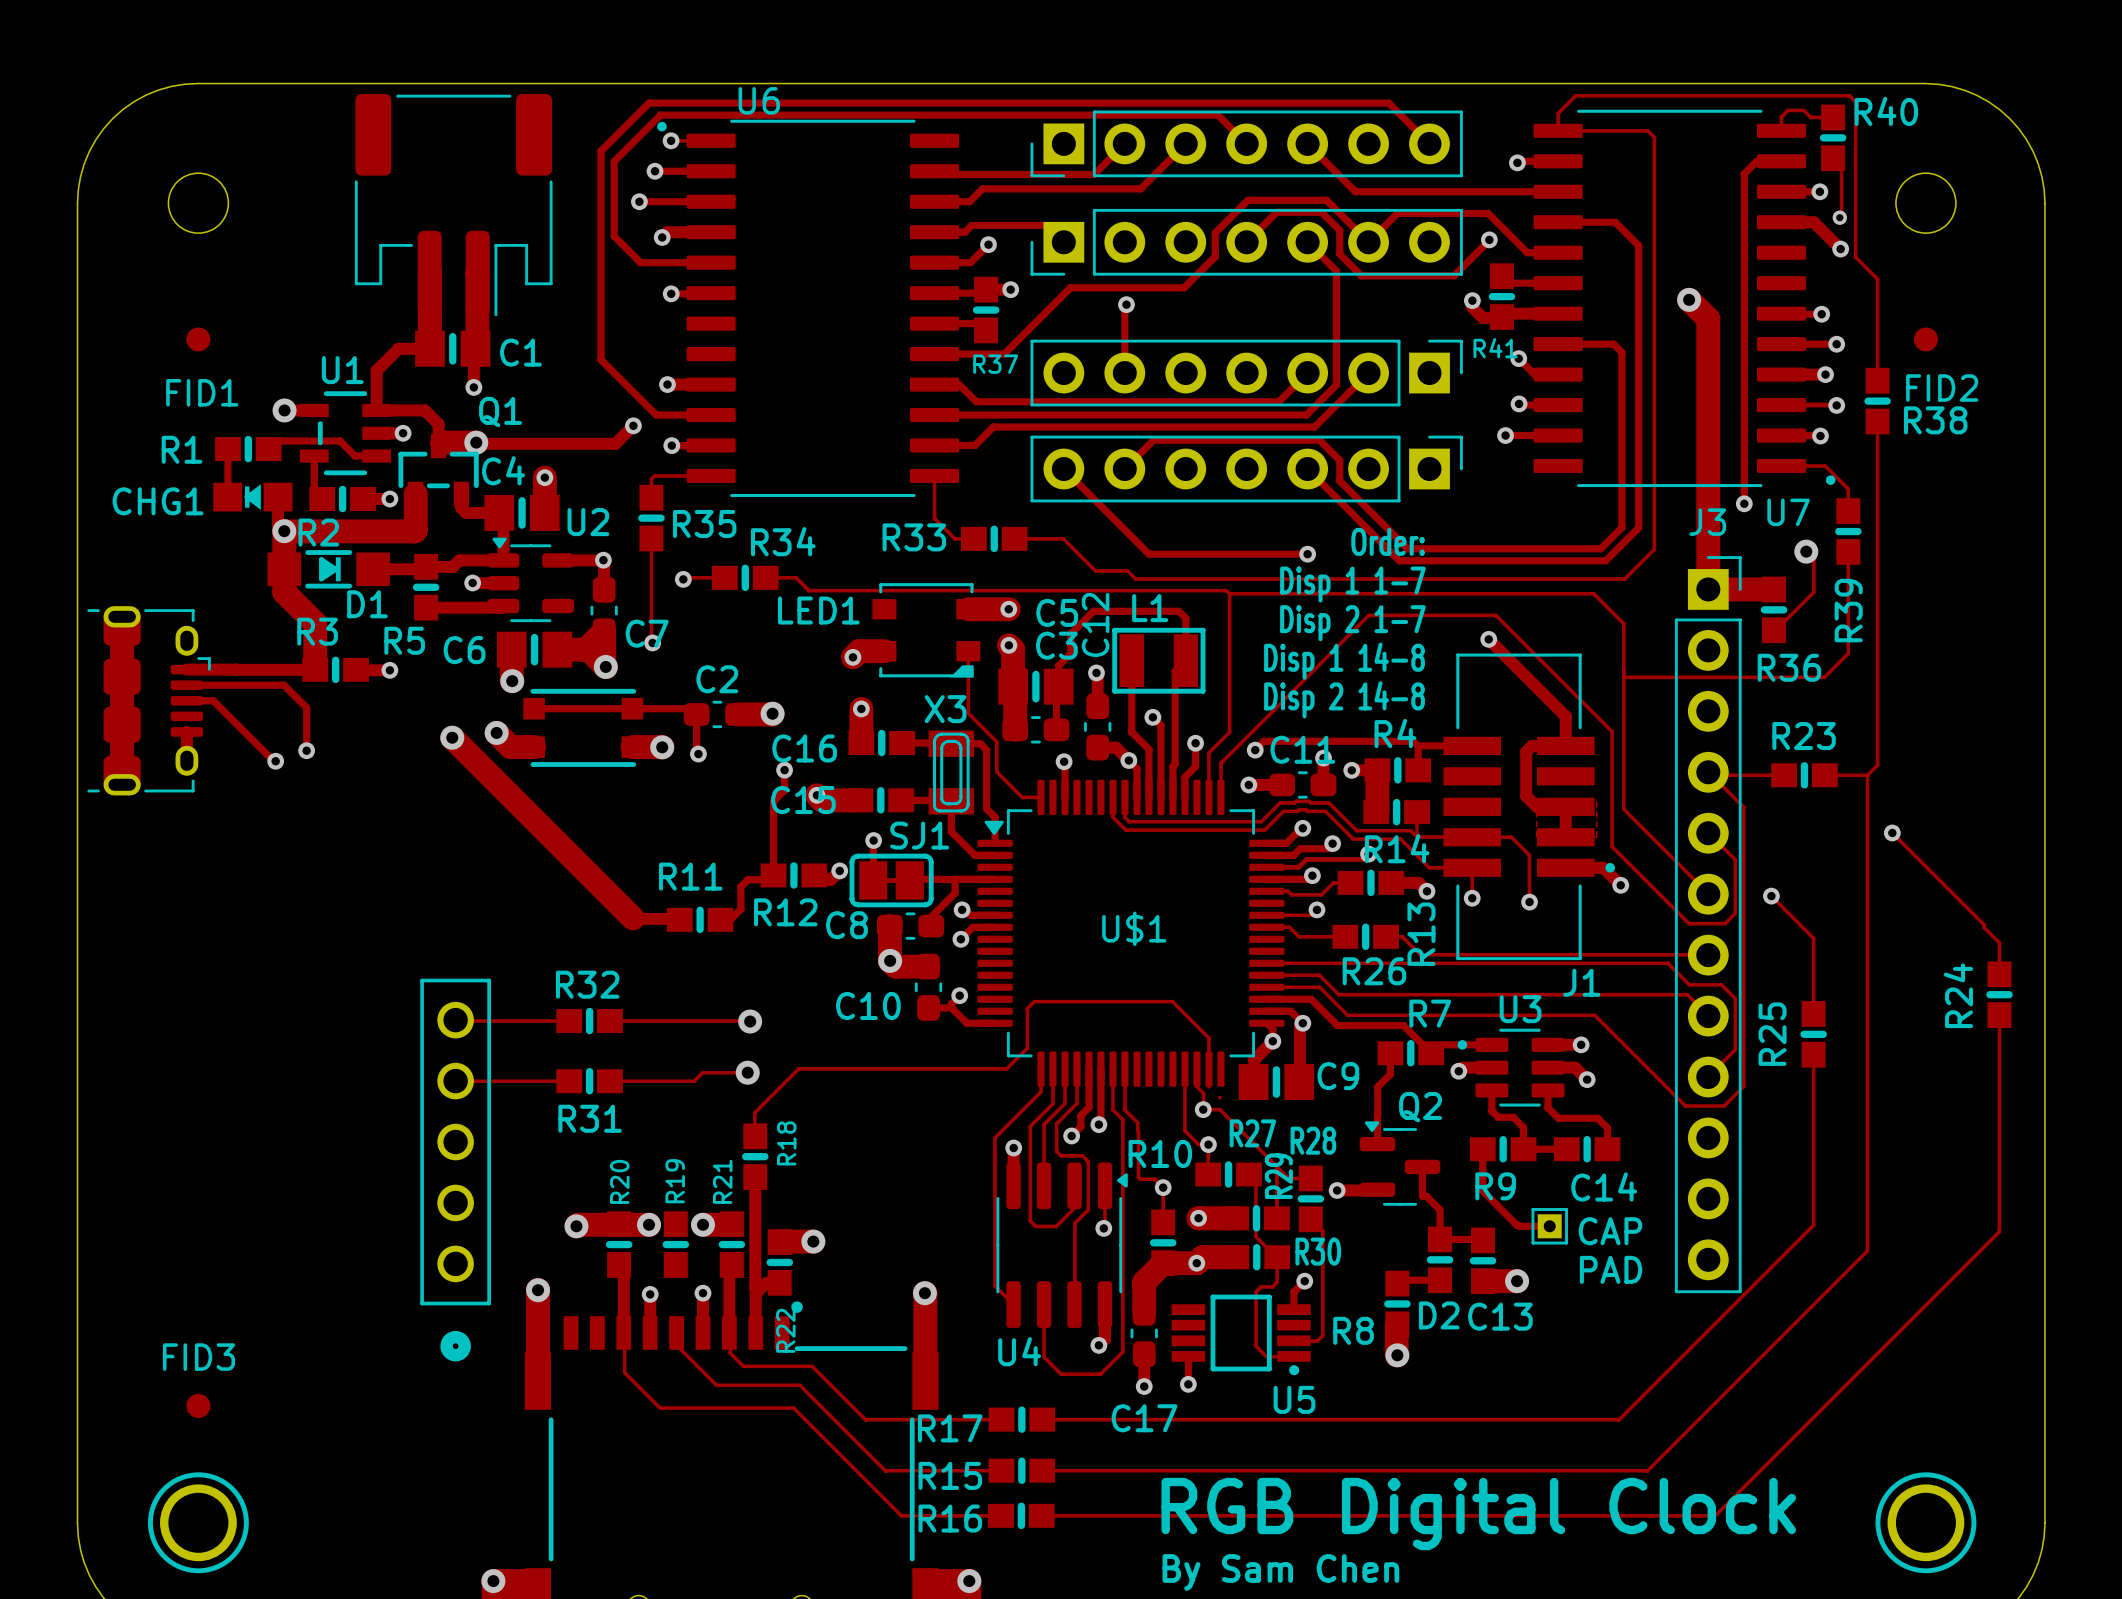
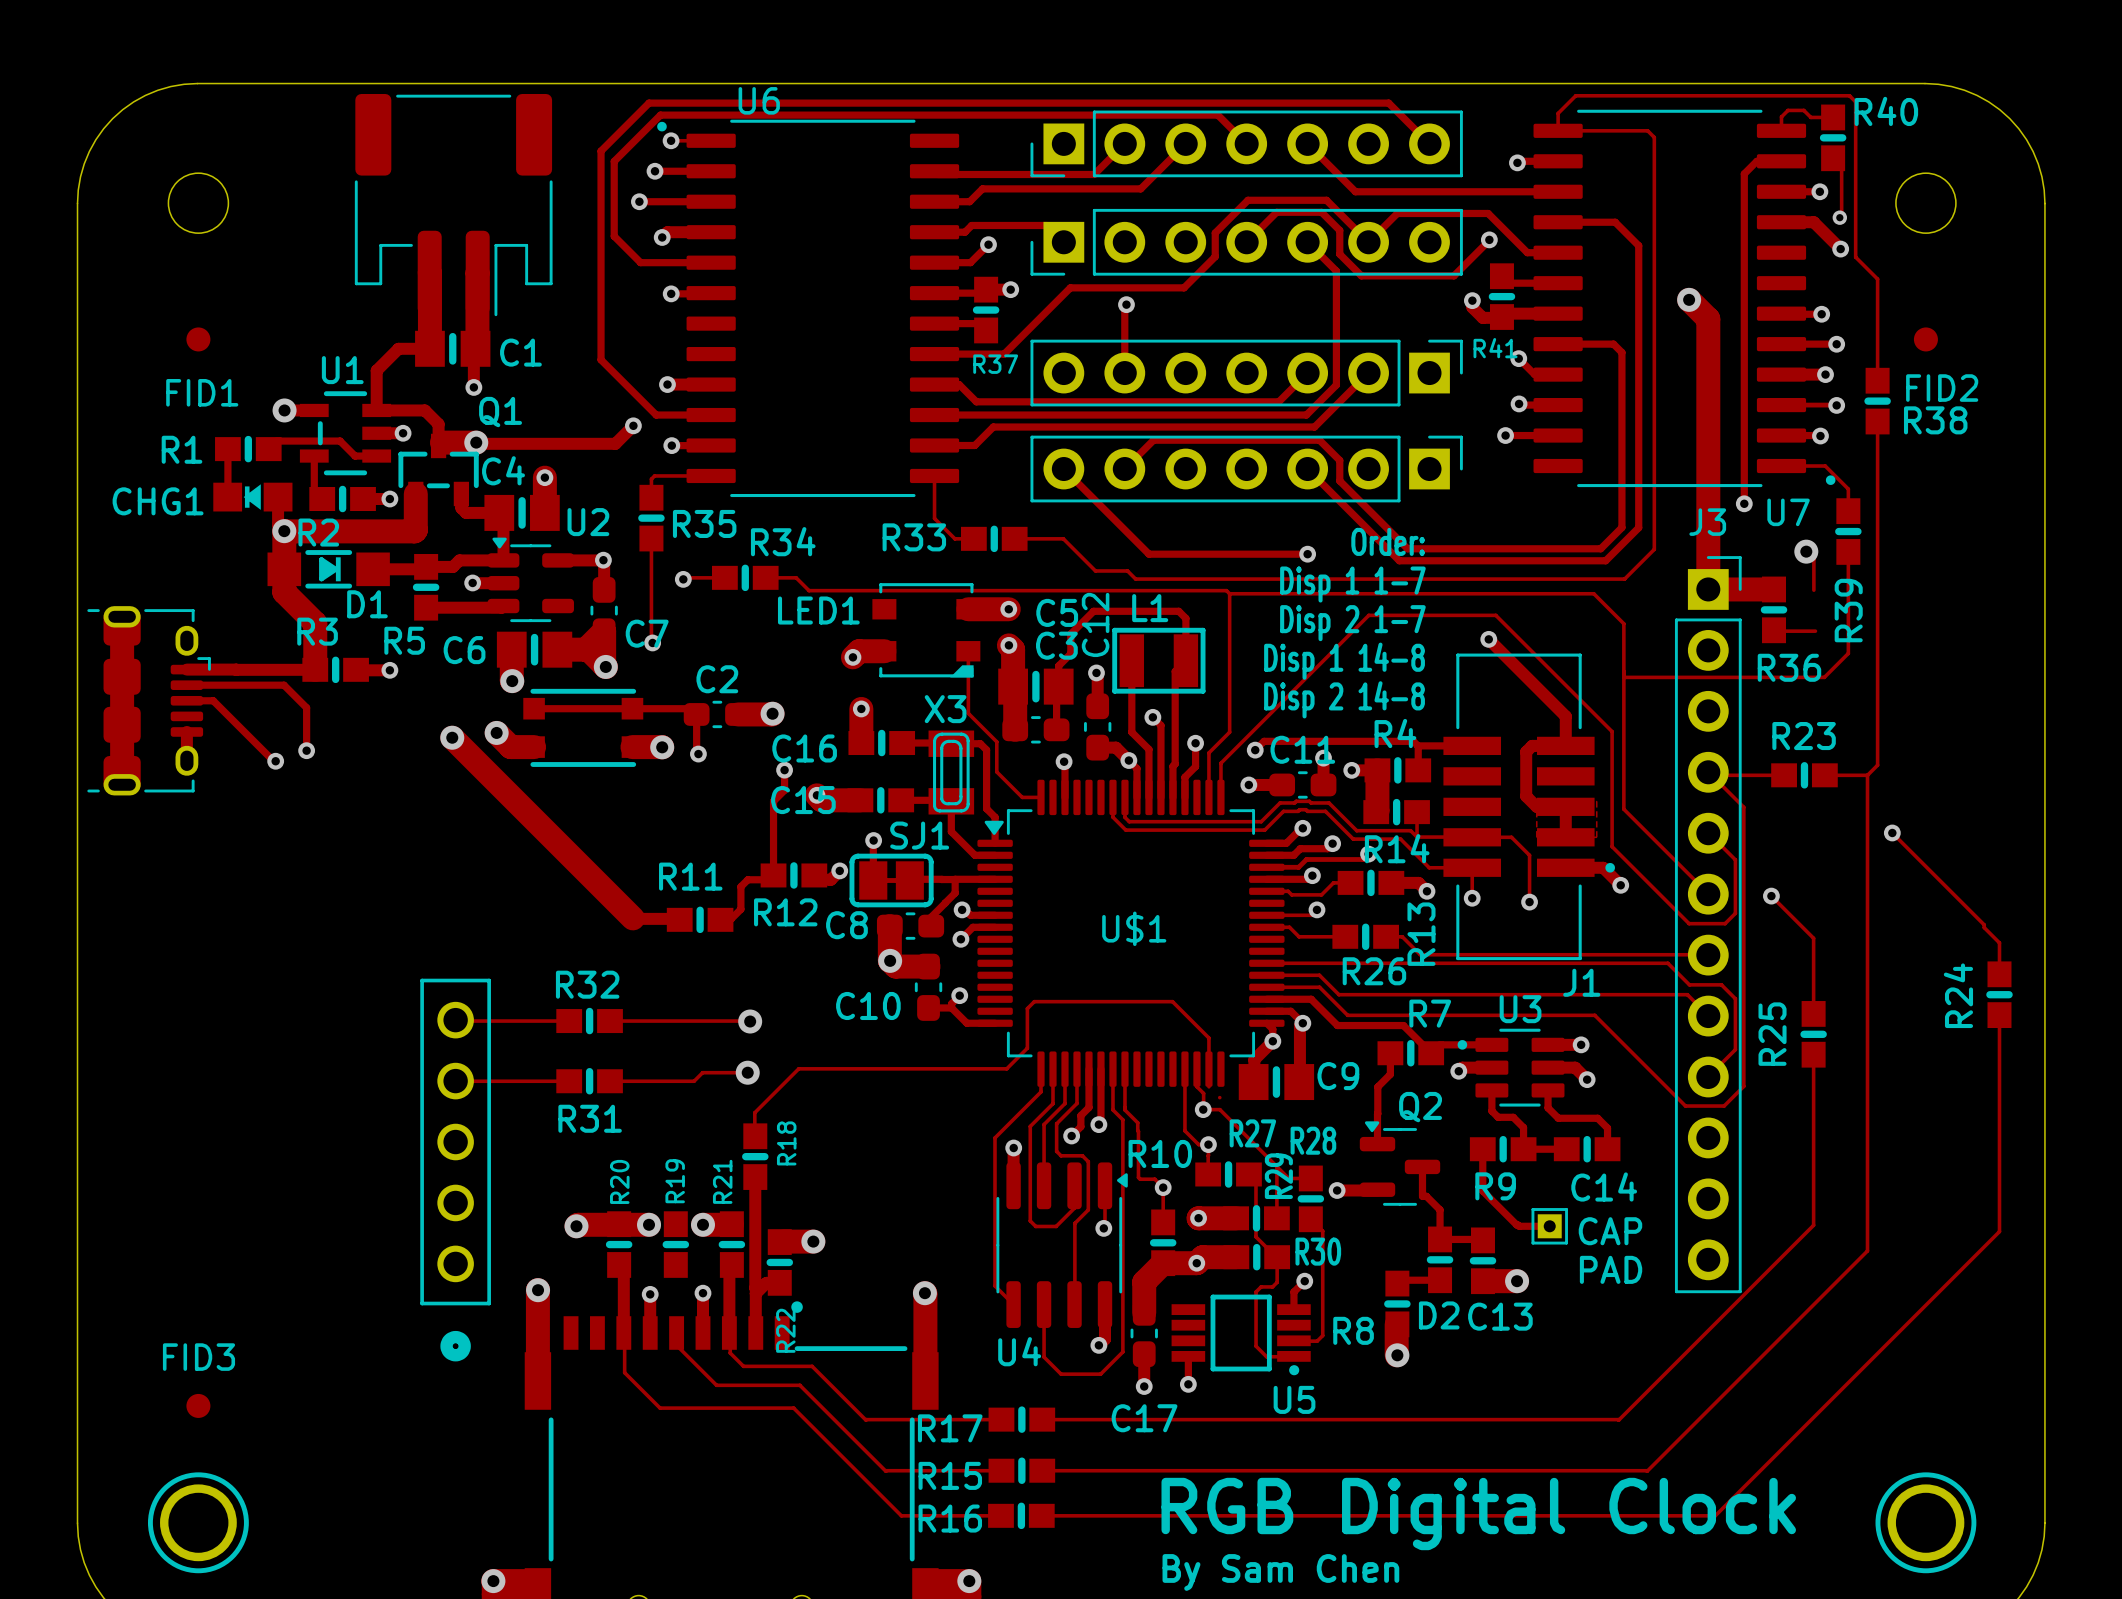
track: (1813, 590) (1774, 631) -> (1815, 631) (1774, 631)

